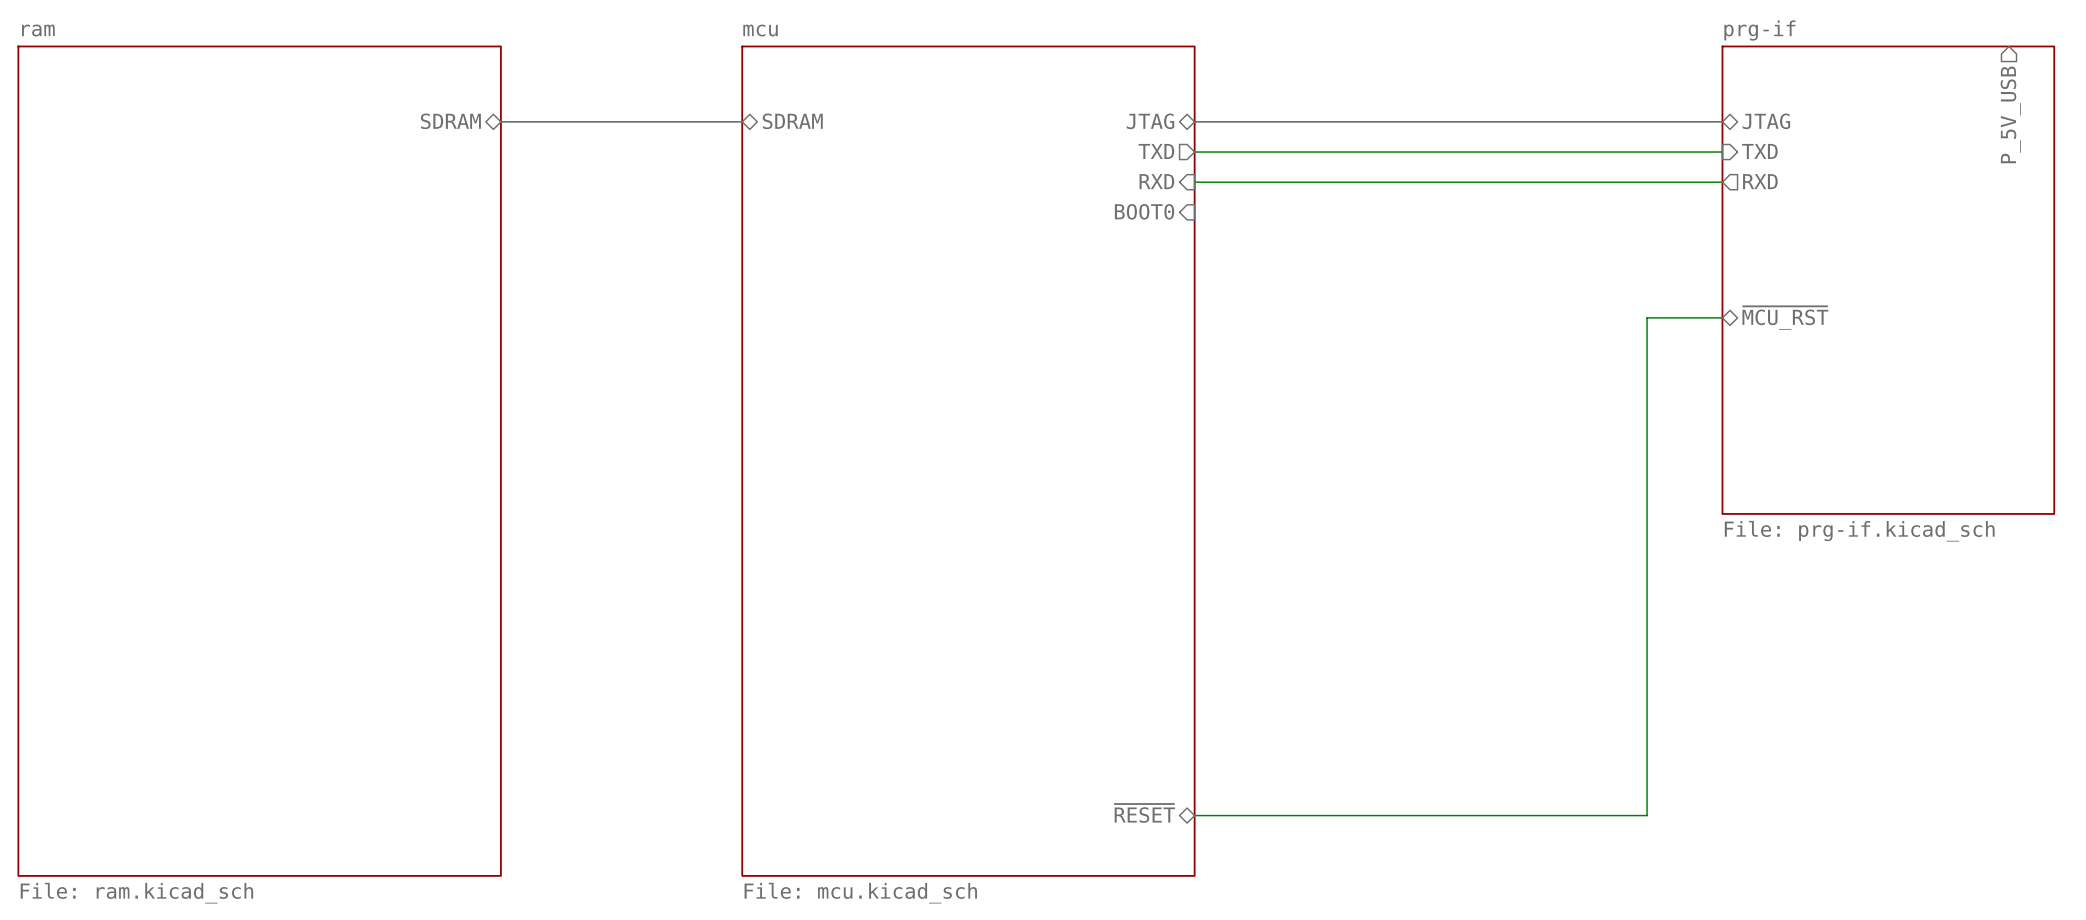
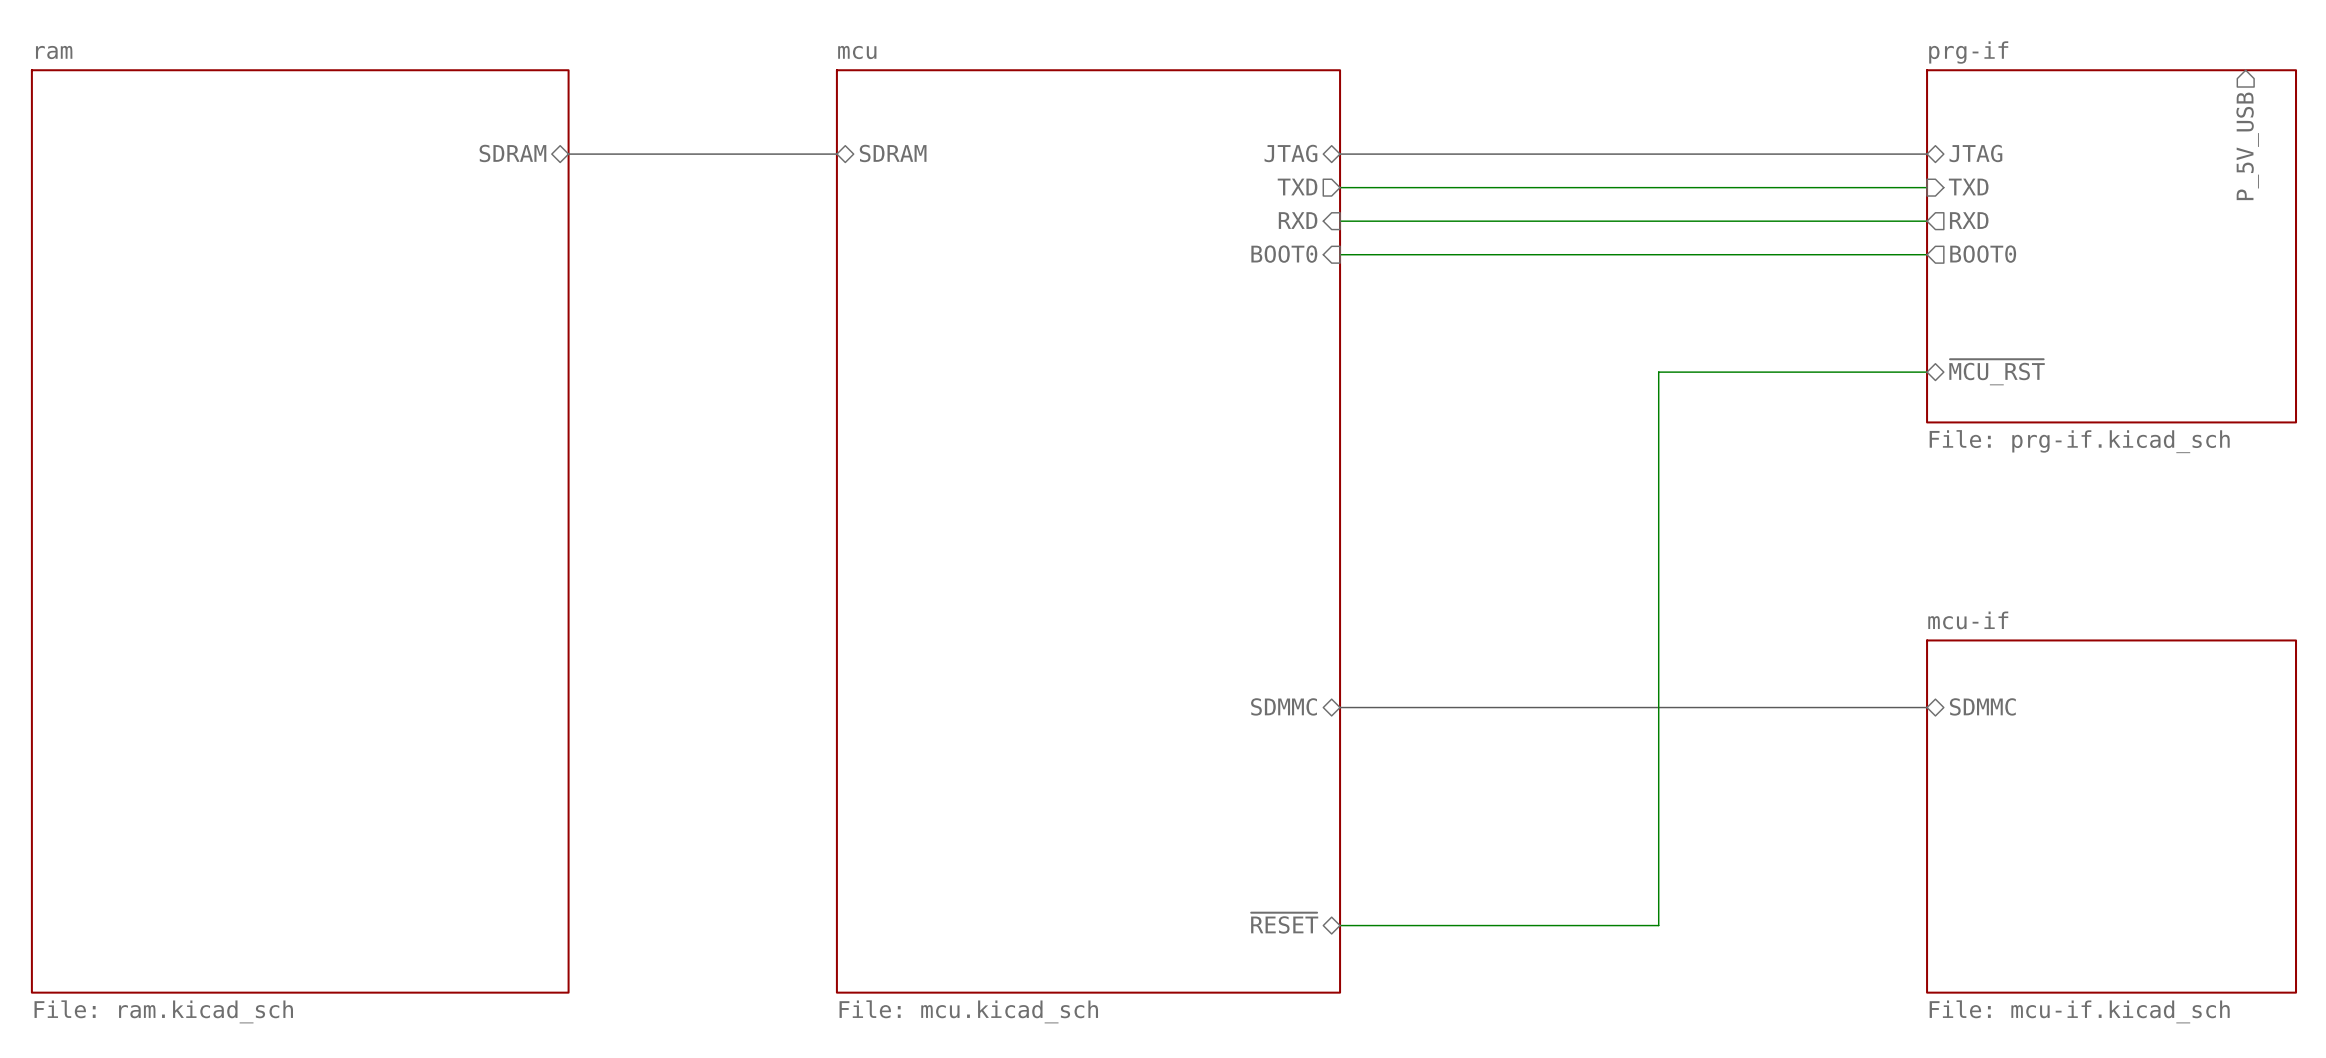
sheet prg-if: none -> File: prg-if.kicad_sch (2111, 246)
sheet pin: none -> BOOT0 (1983, 254)
wire: none -> (1340, 254) (1927, 254)
sheet prg-if: File: prg-if.kicad_sch (1888, 280) -> none
wire: (1647, 317) (1647, 815) (1481, 815) -> (1843, 372) (1658, 372) (1658, 925)
sheet pin: none -> SDMMC (1284, 706)
sheet pin: none -> SDMMC (1982, 706)
bus: none -> (1340, 707) (1927, 707)
sheet mcu-if: none -> File: mcu-if.kicad_sch (2111, 816)

